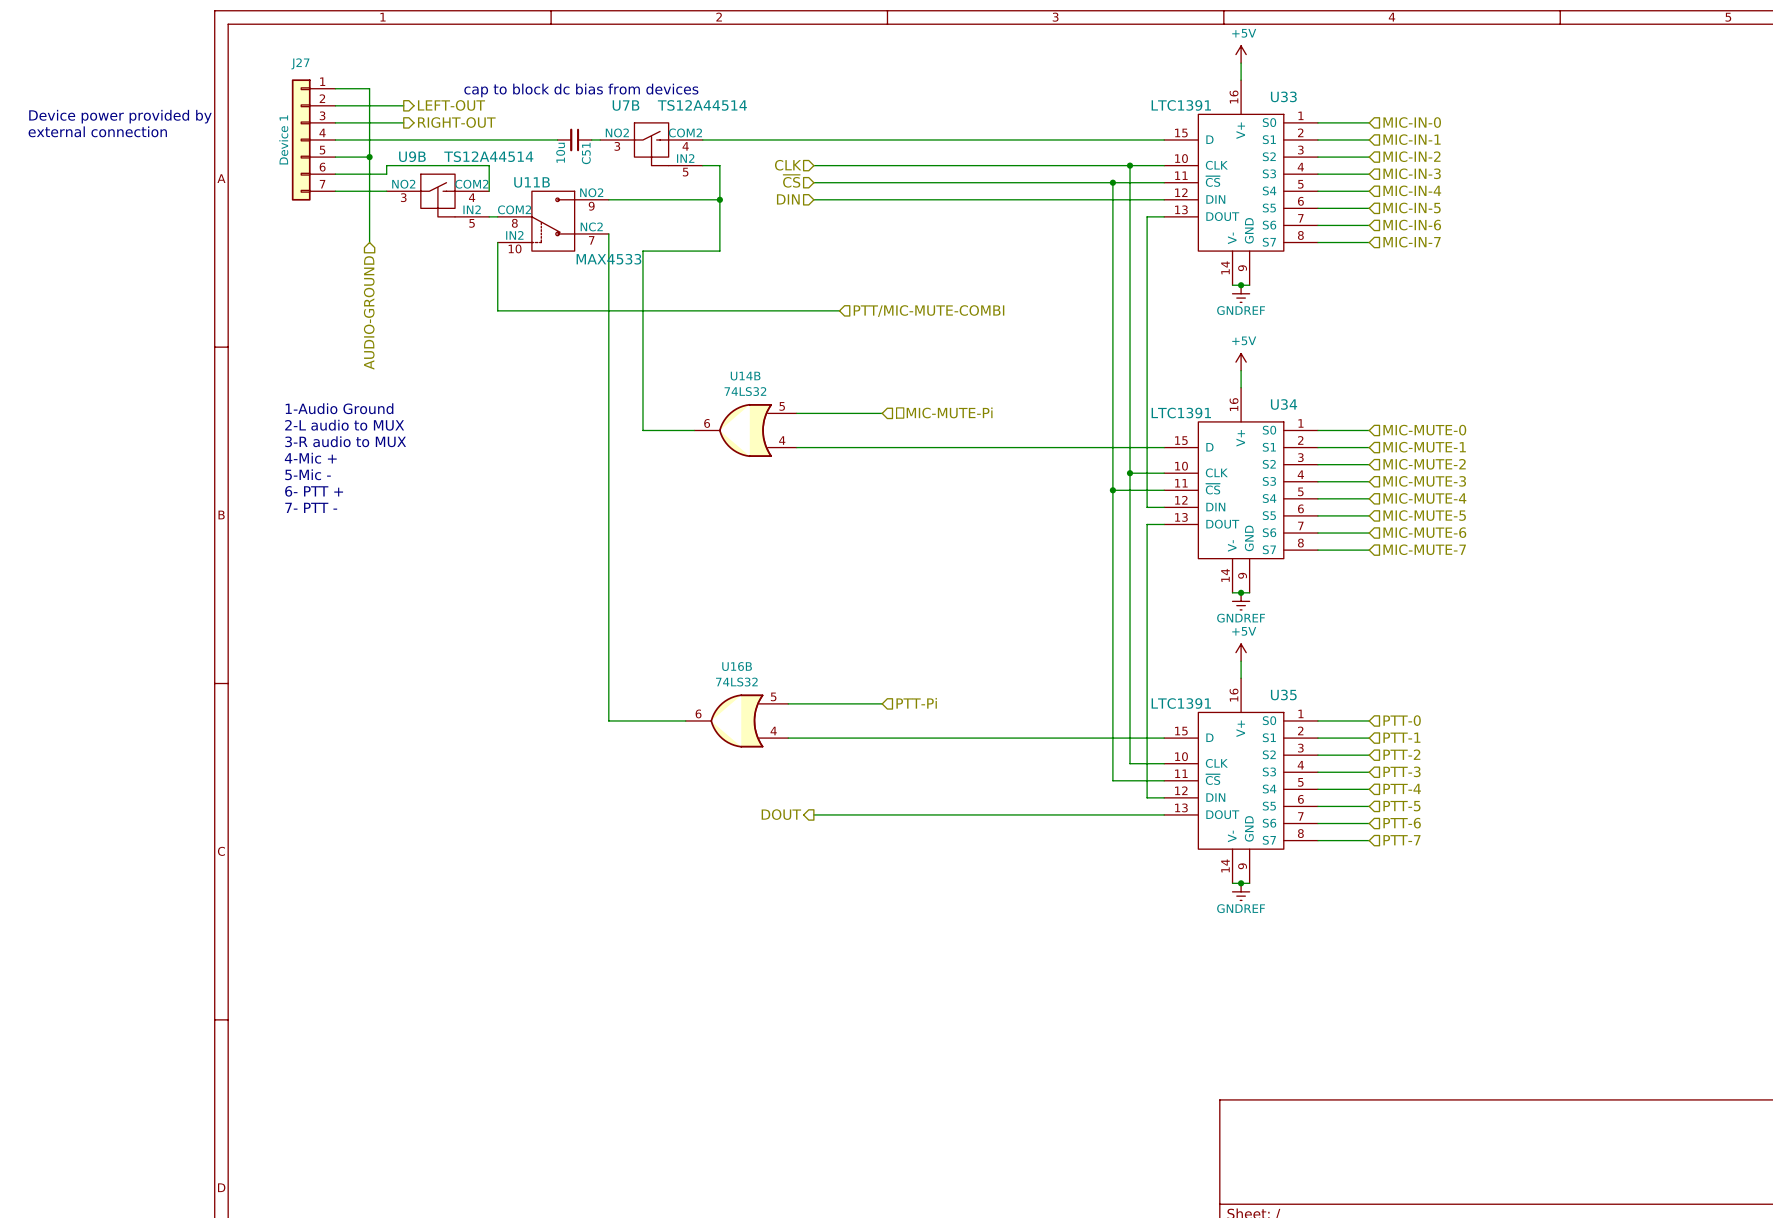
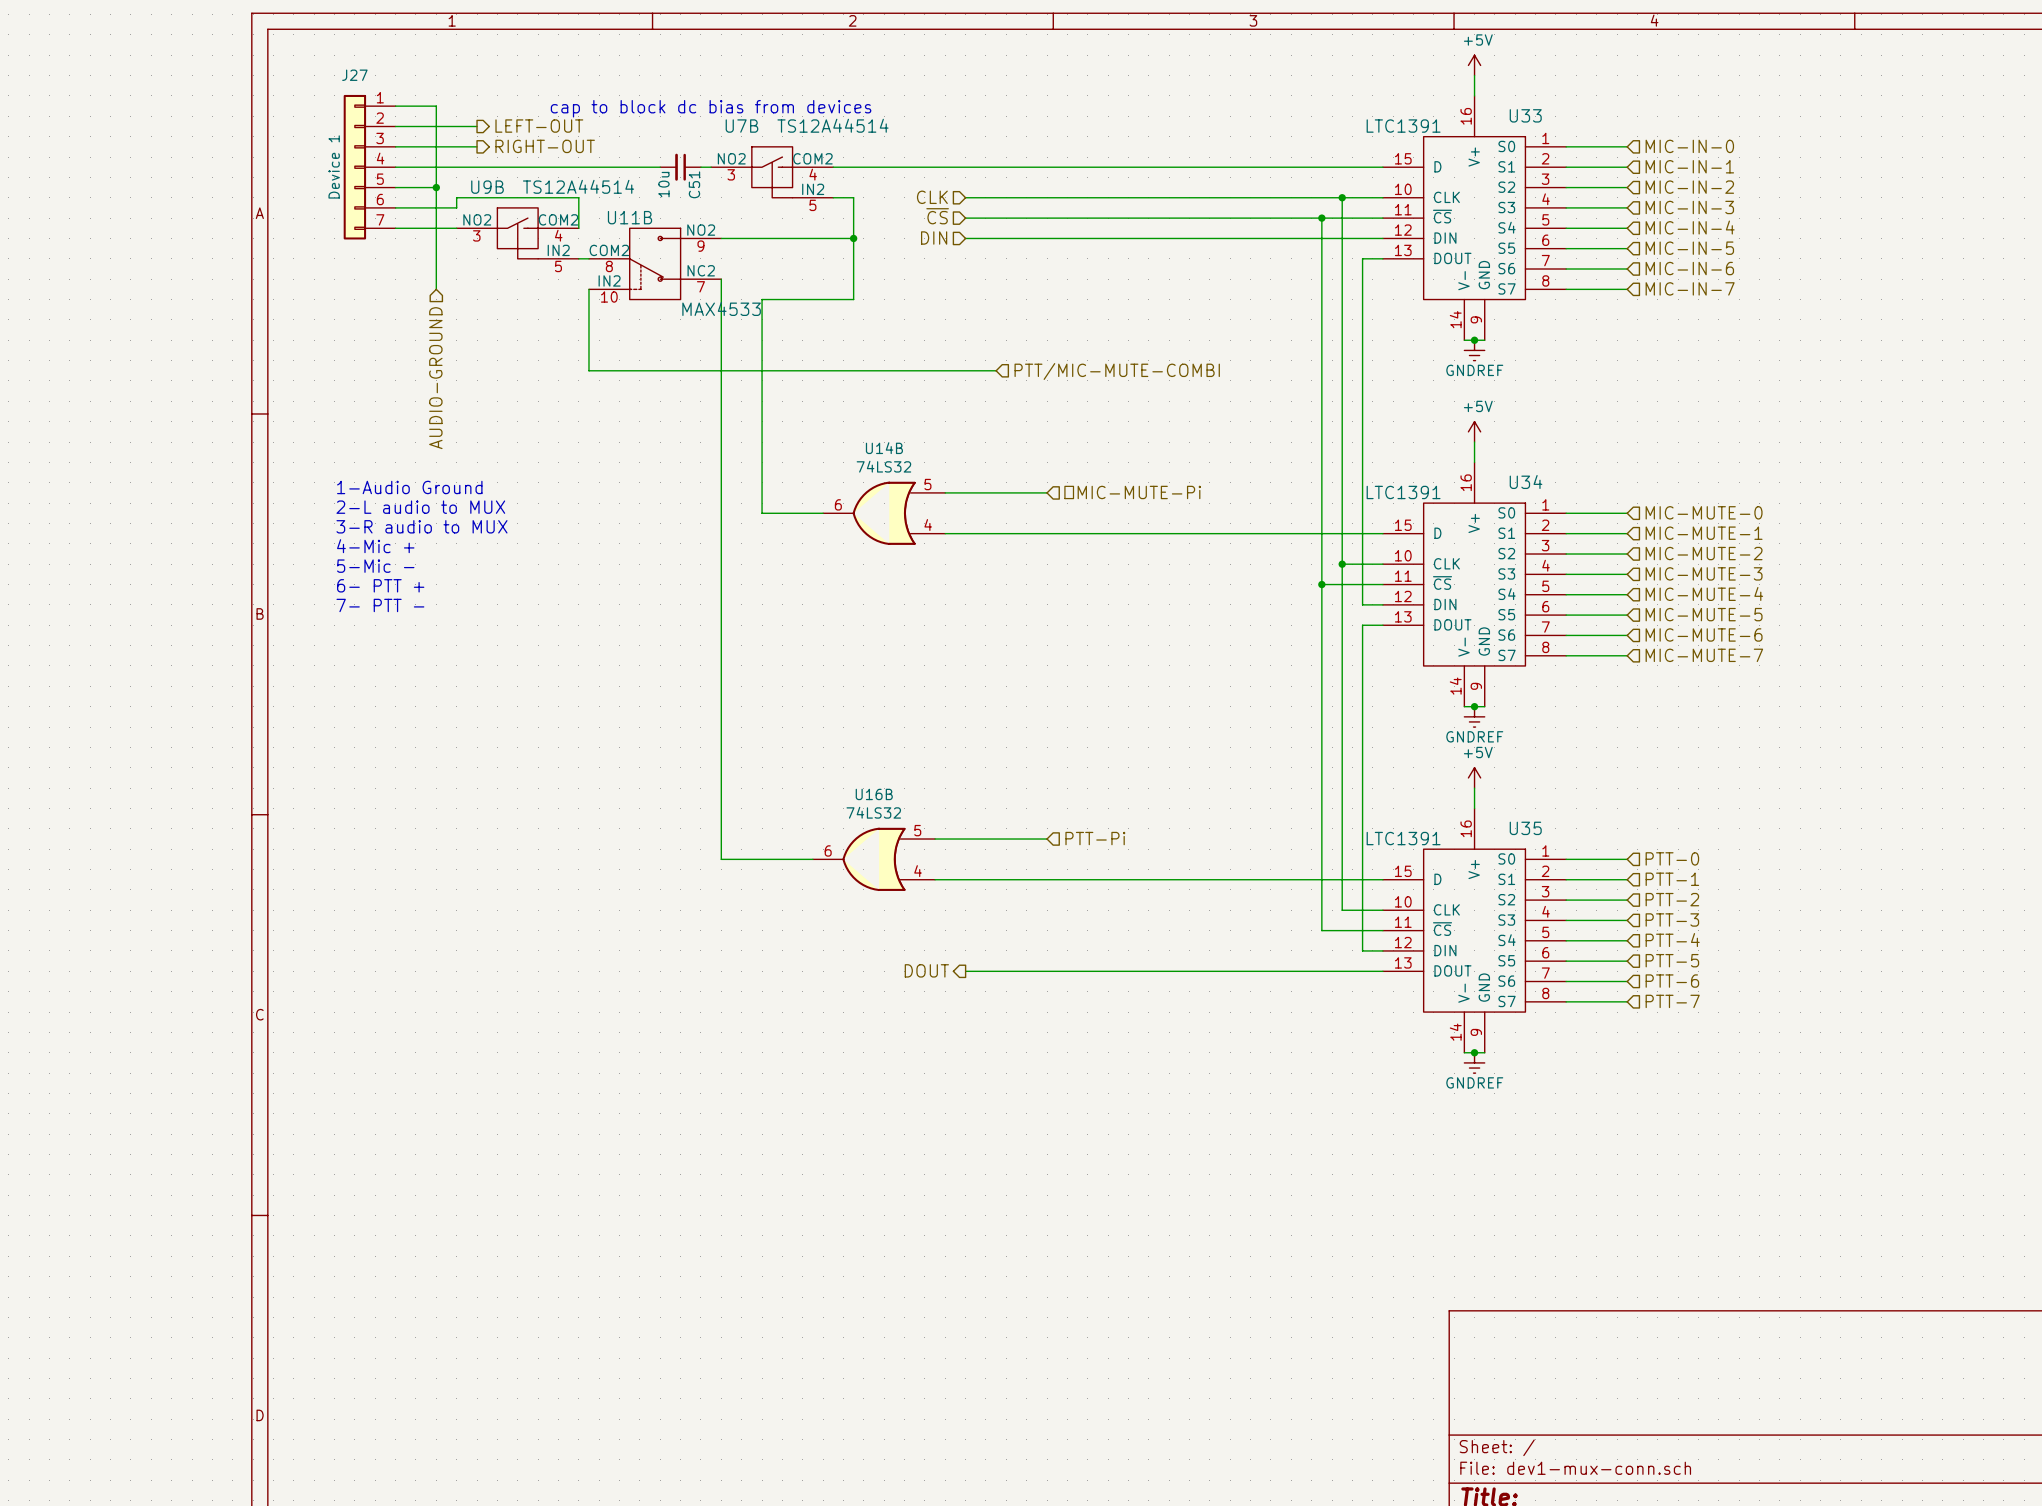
text: Device power provided by (120, 116) -> none
text: external connection (97, 131) -> none

